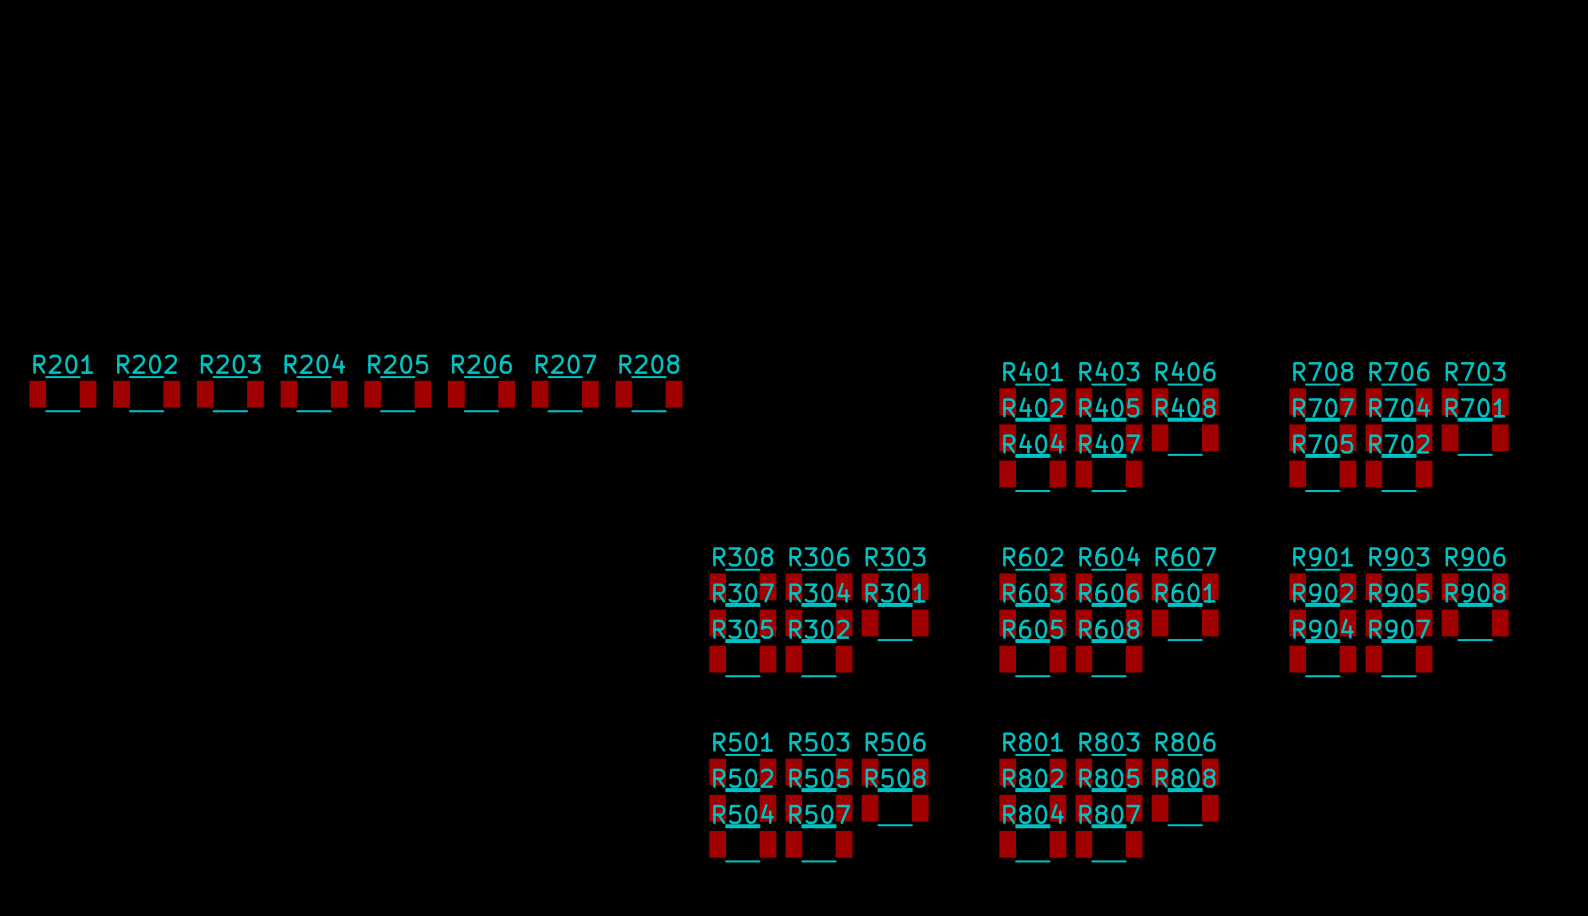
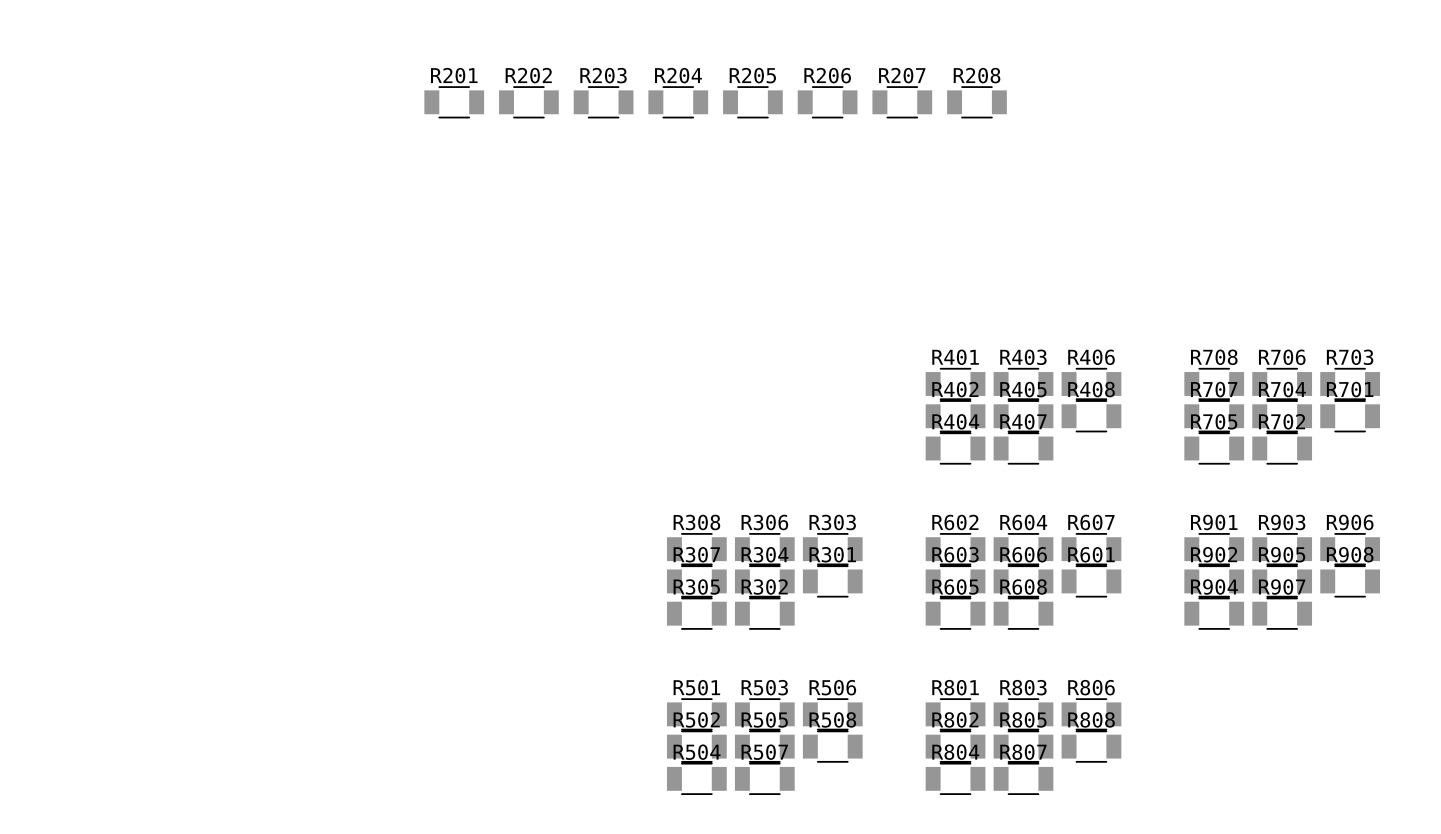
R201 position: (62, 394) -> (454, 102)
R202 position: (146, 394) -> (528, 102)
R203 position: (230, 394) -> (603, 102)
R204 position: (314, 394) -> (678, 102)
R205 position: (397, 394) -> (752, 102)
R206 position: (481, 394) -> (827, 102)
R207 position: (565, 394) -> (902, 102)
R208 position: (648, 394) -> (976, 102)

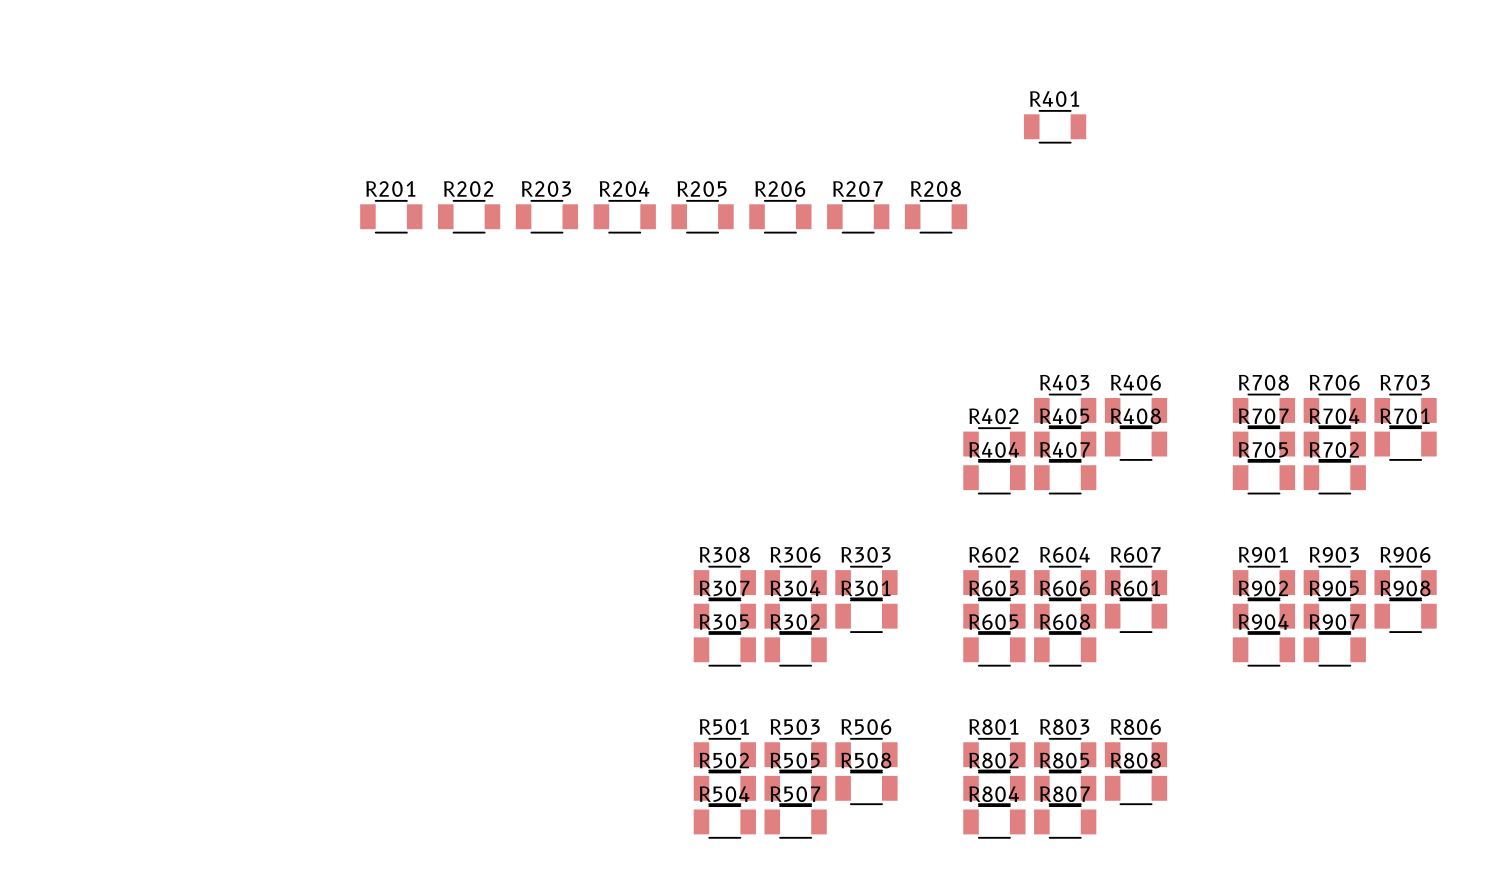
R201 position: (454, 102) -> (391, 216)
R202 position: (528, 102) -> (469, 216)
R203 position: (603, 102) -> (546, 216)
R204 position: (678, 102) -> (624, 216)
R205 position: (752, 102) -> (702, 216)
R206 position: (827, 102) -> (780, 216)
R207 position: (902, 102) -> (858, 216)
R208 position: (976, 102) -> (936, 216)
R401 position: (955, 383) -> (1055, 126)

